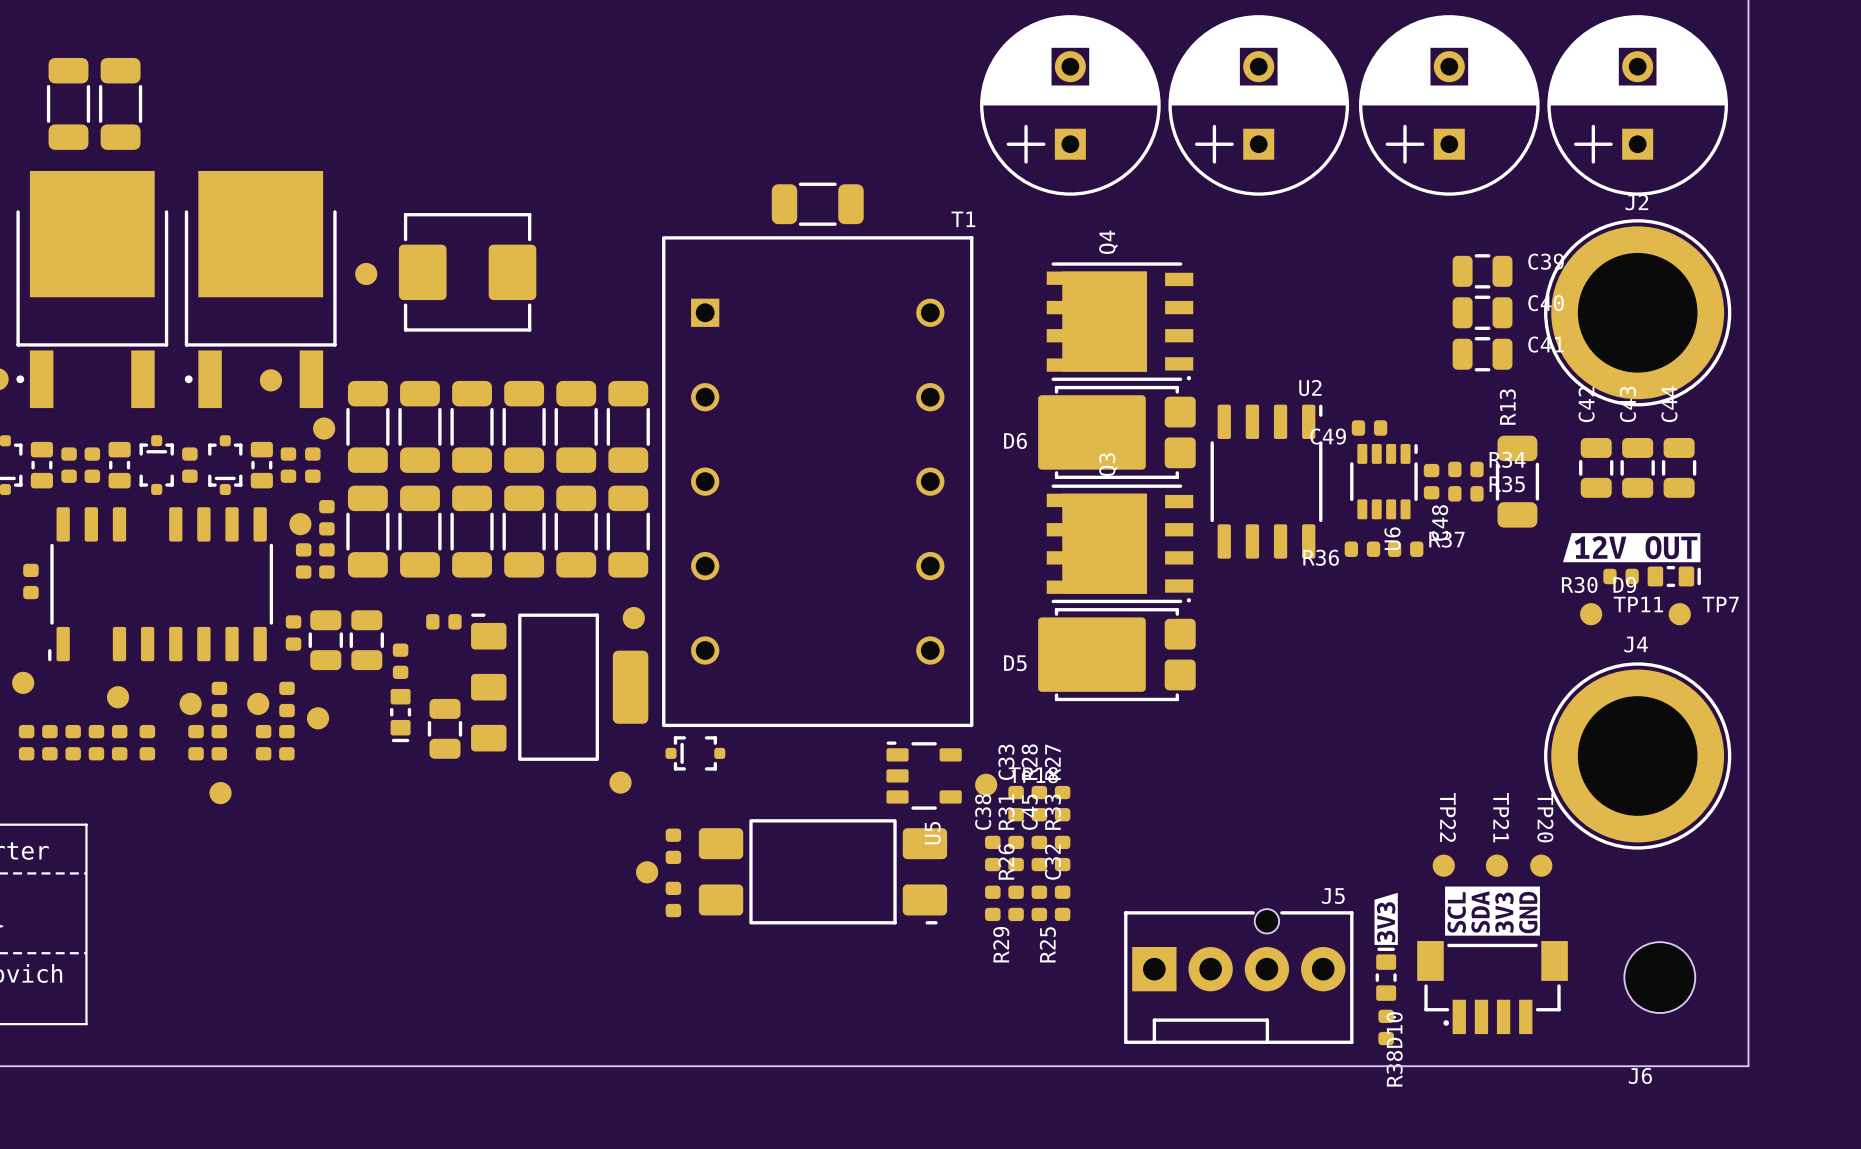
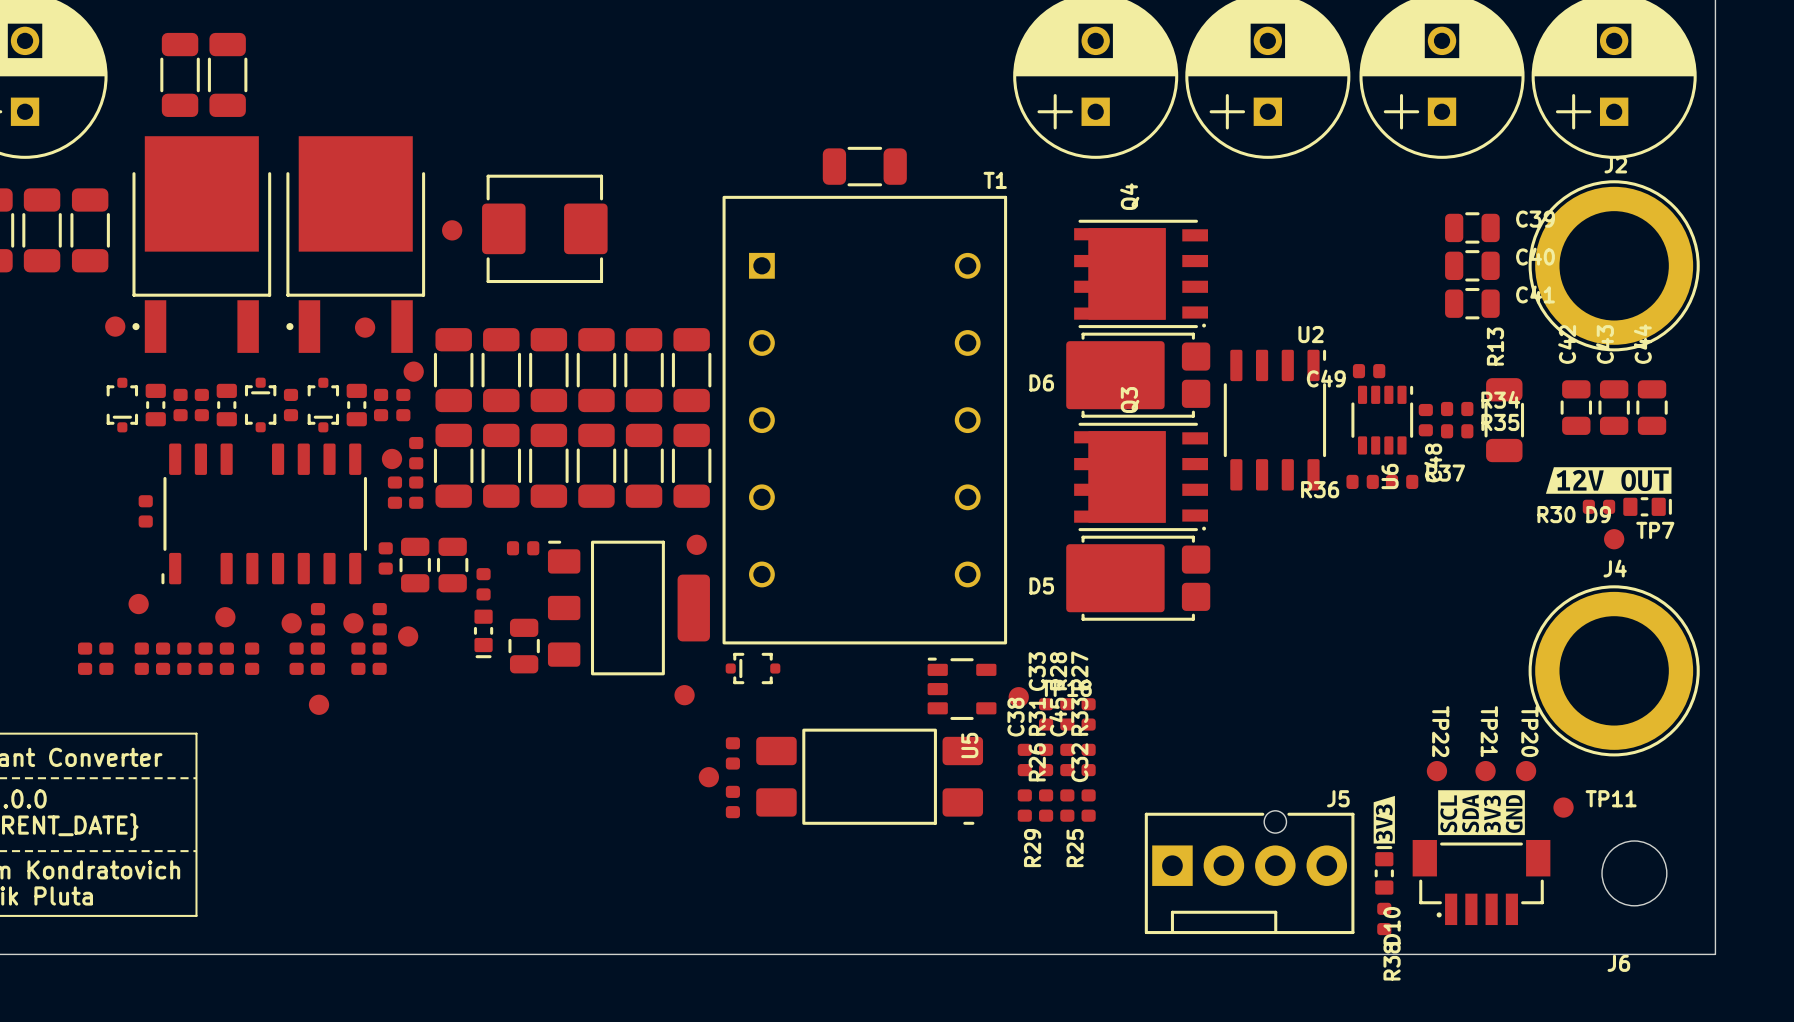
TP11 position: (1591, 614) -> (1563, 807)
TP7 position: (1679, 614) -> (1614, 539)

